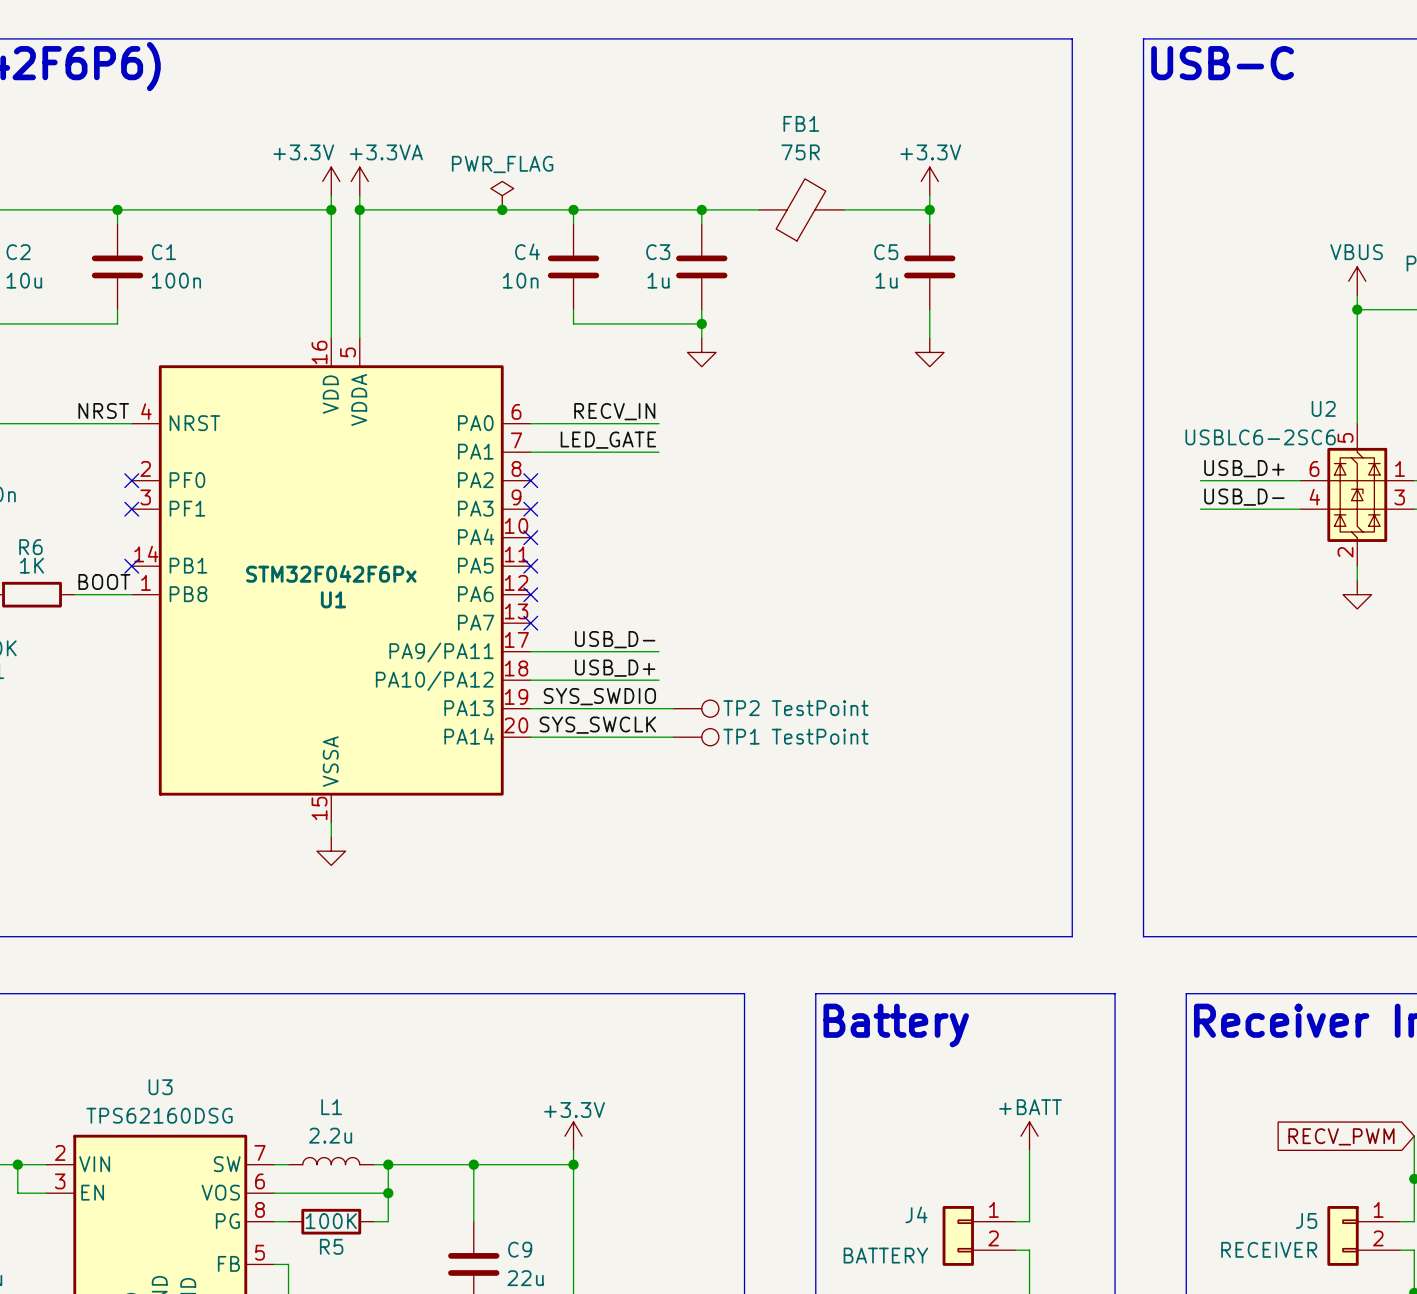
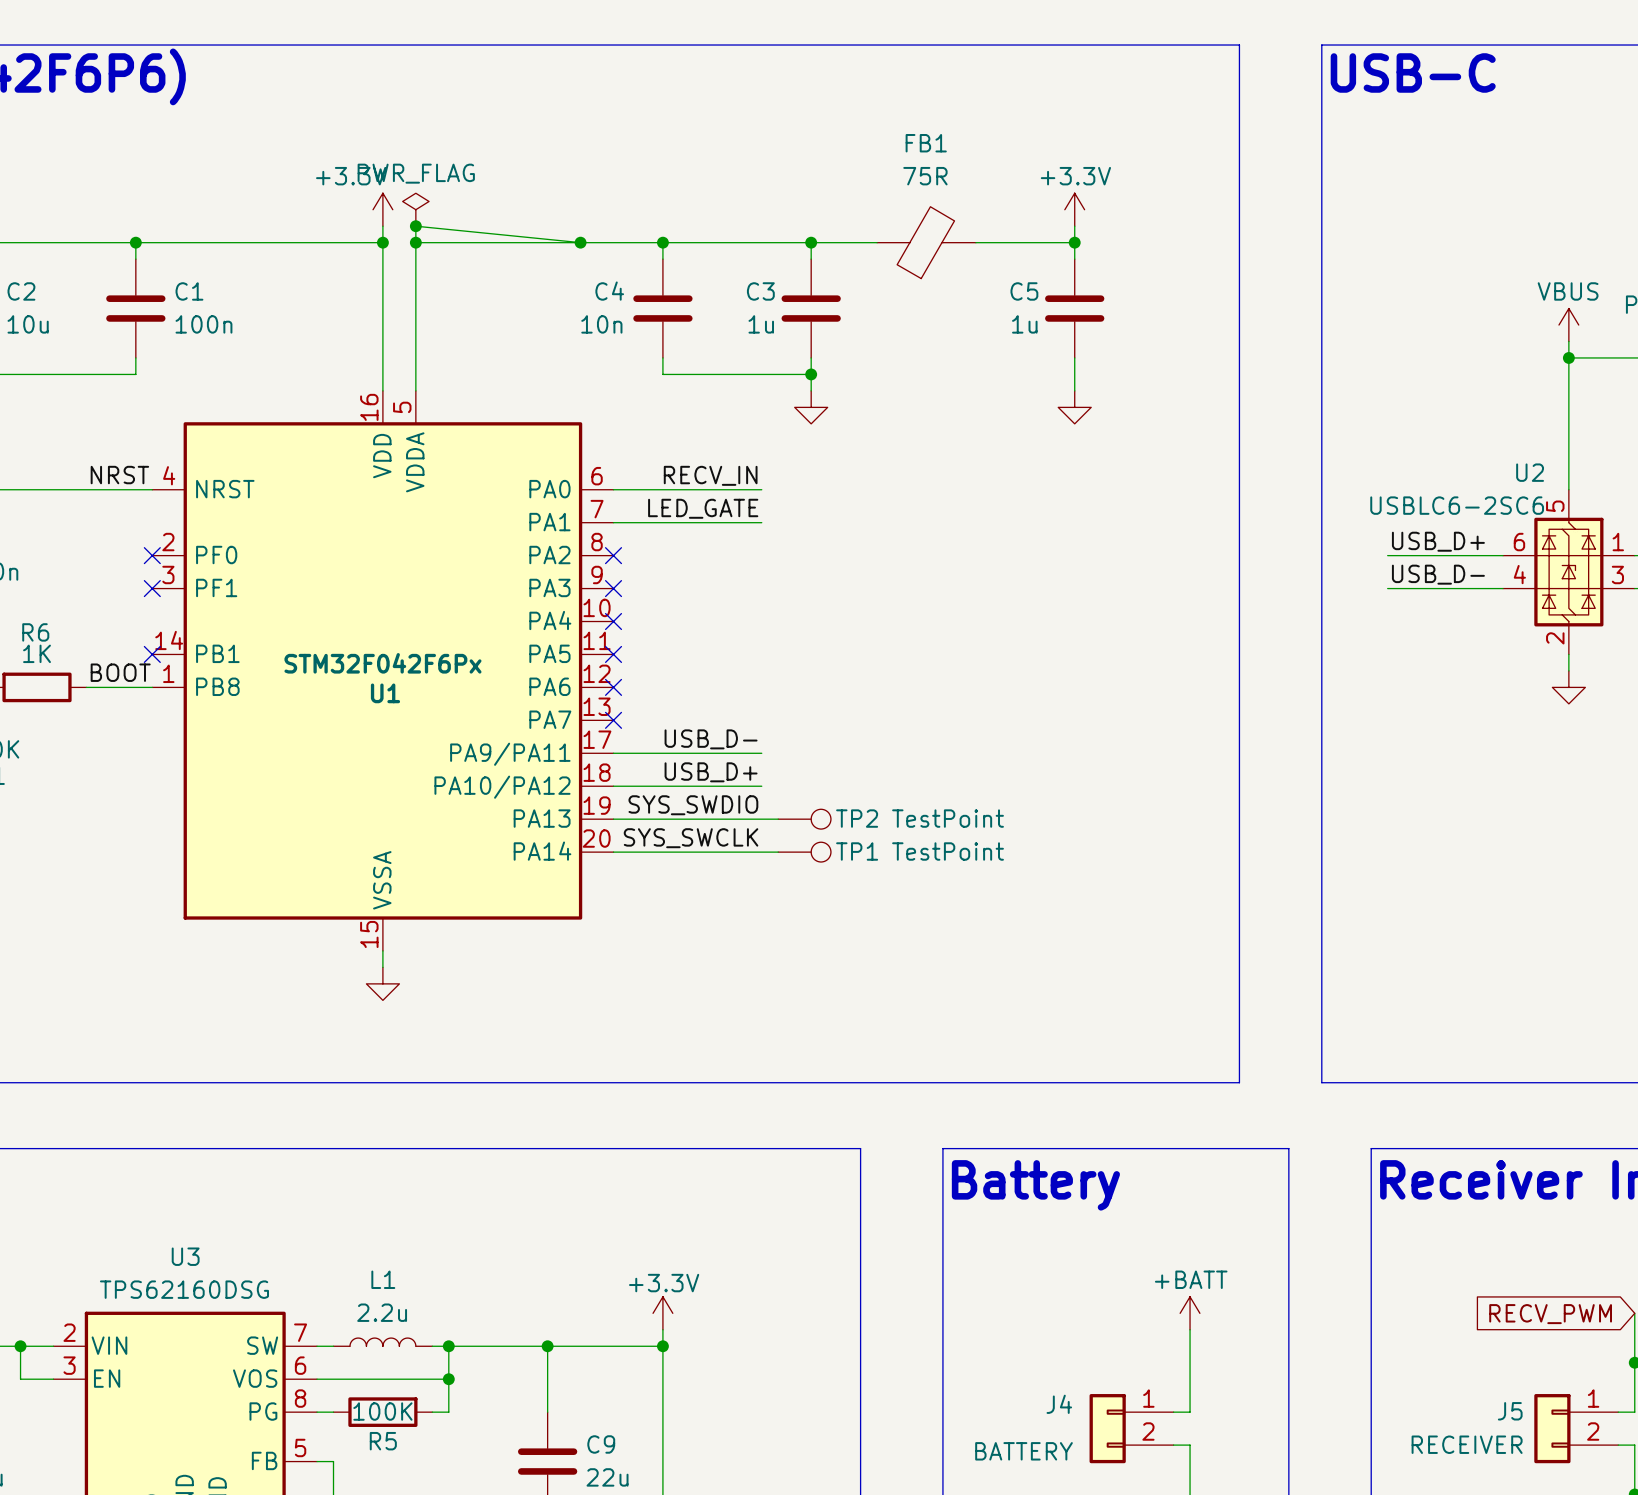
power symbol: +3.3VA (359, 181) -> PWR_FLAG (415, 209)
wire: none -> (415, 226) (580, 242)
junction: none -> (415, 226)
power symbol: PWR_FLAG (502, 195) -> none

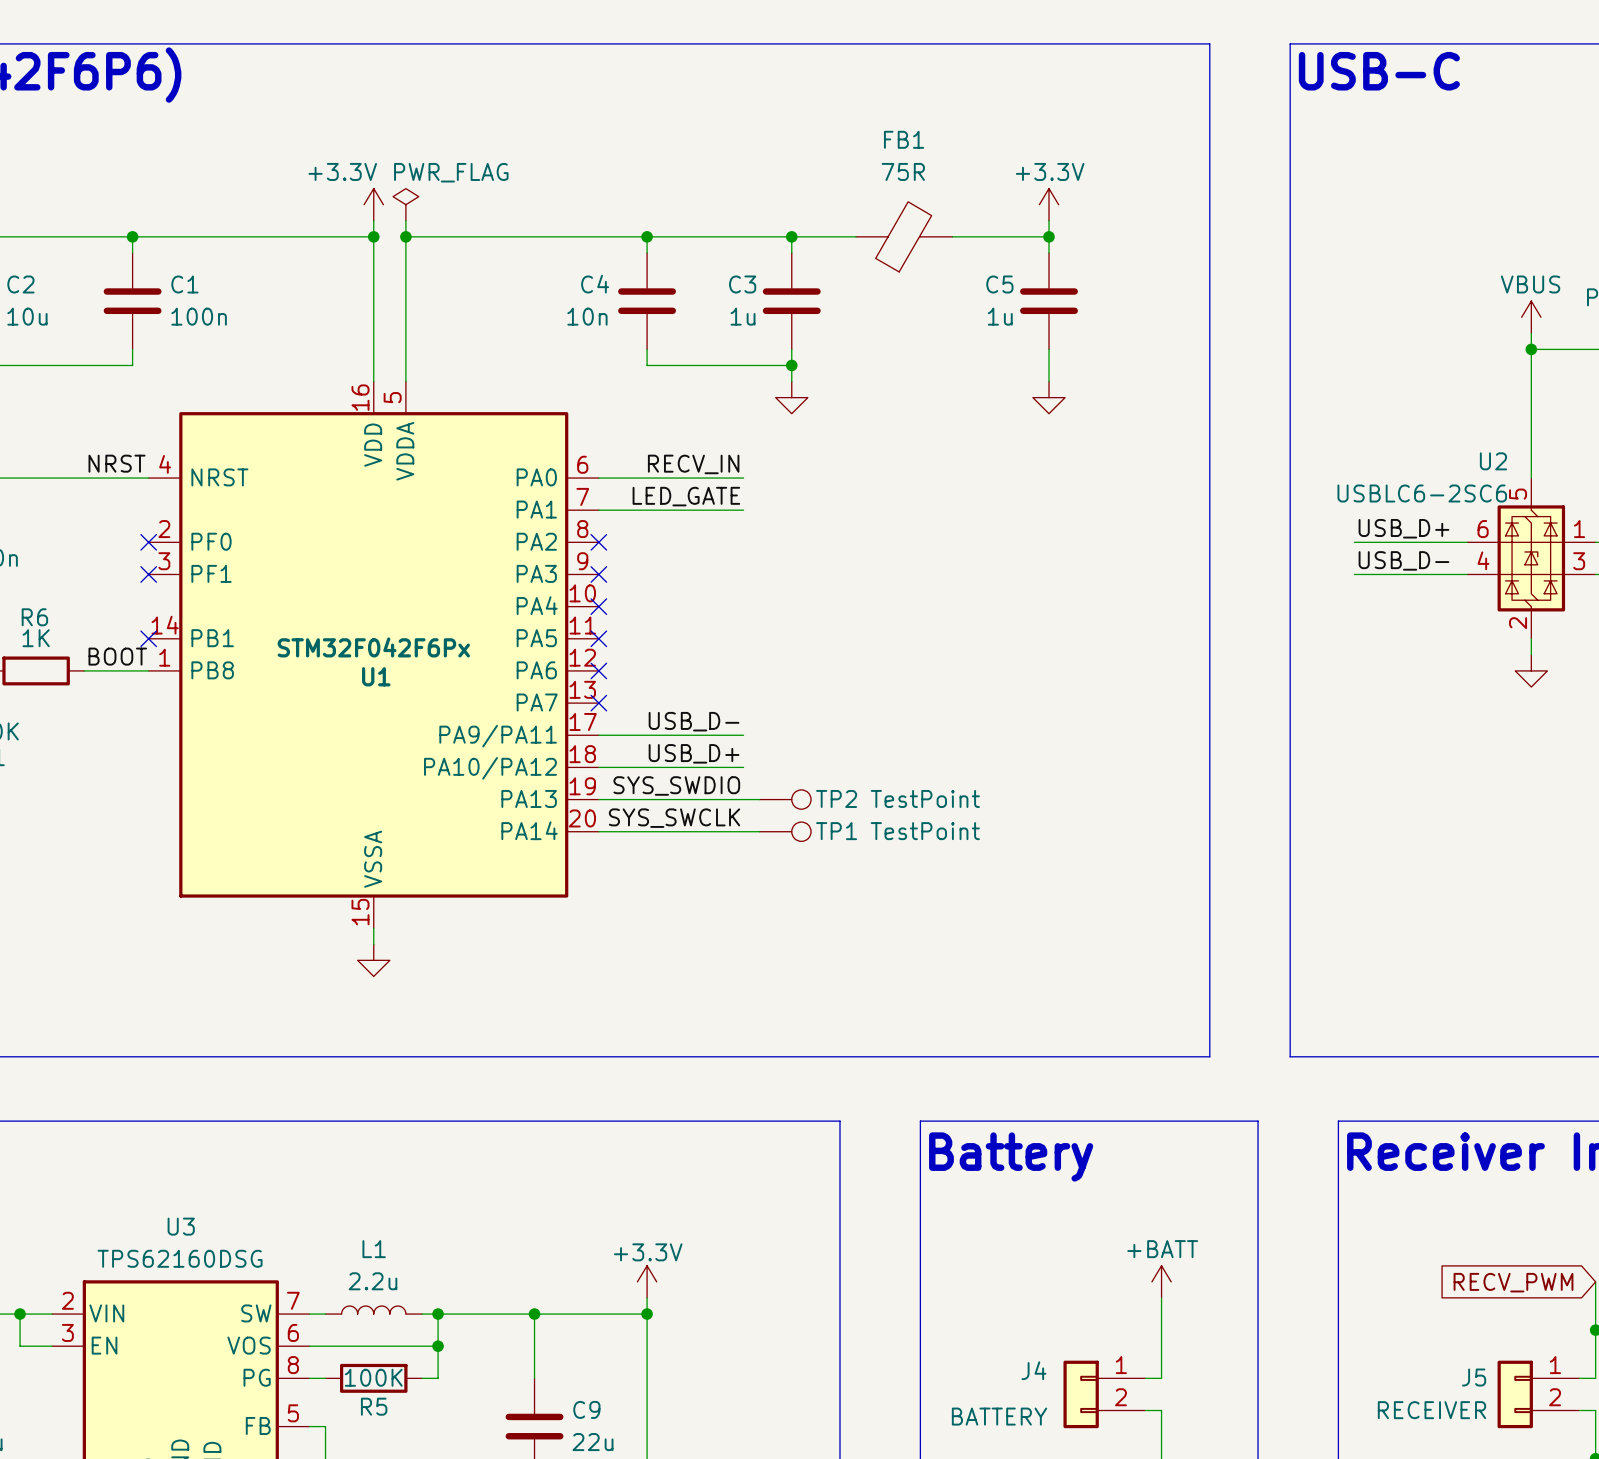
power symbol text position: PWR_FLAG (416, 173) -> PWR_FLAG (451, 172)
wire: (415, 226) (580, 242) -> none
junction: (415, 226) -> none
junction: (580, 242) -> none

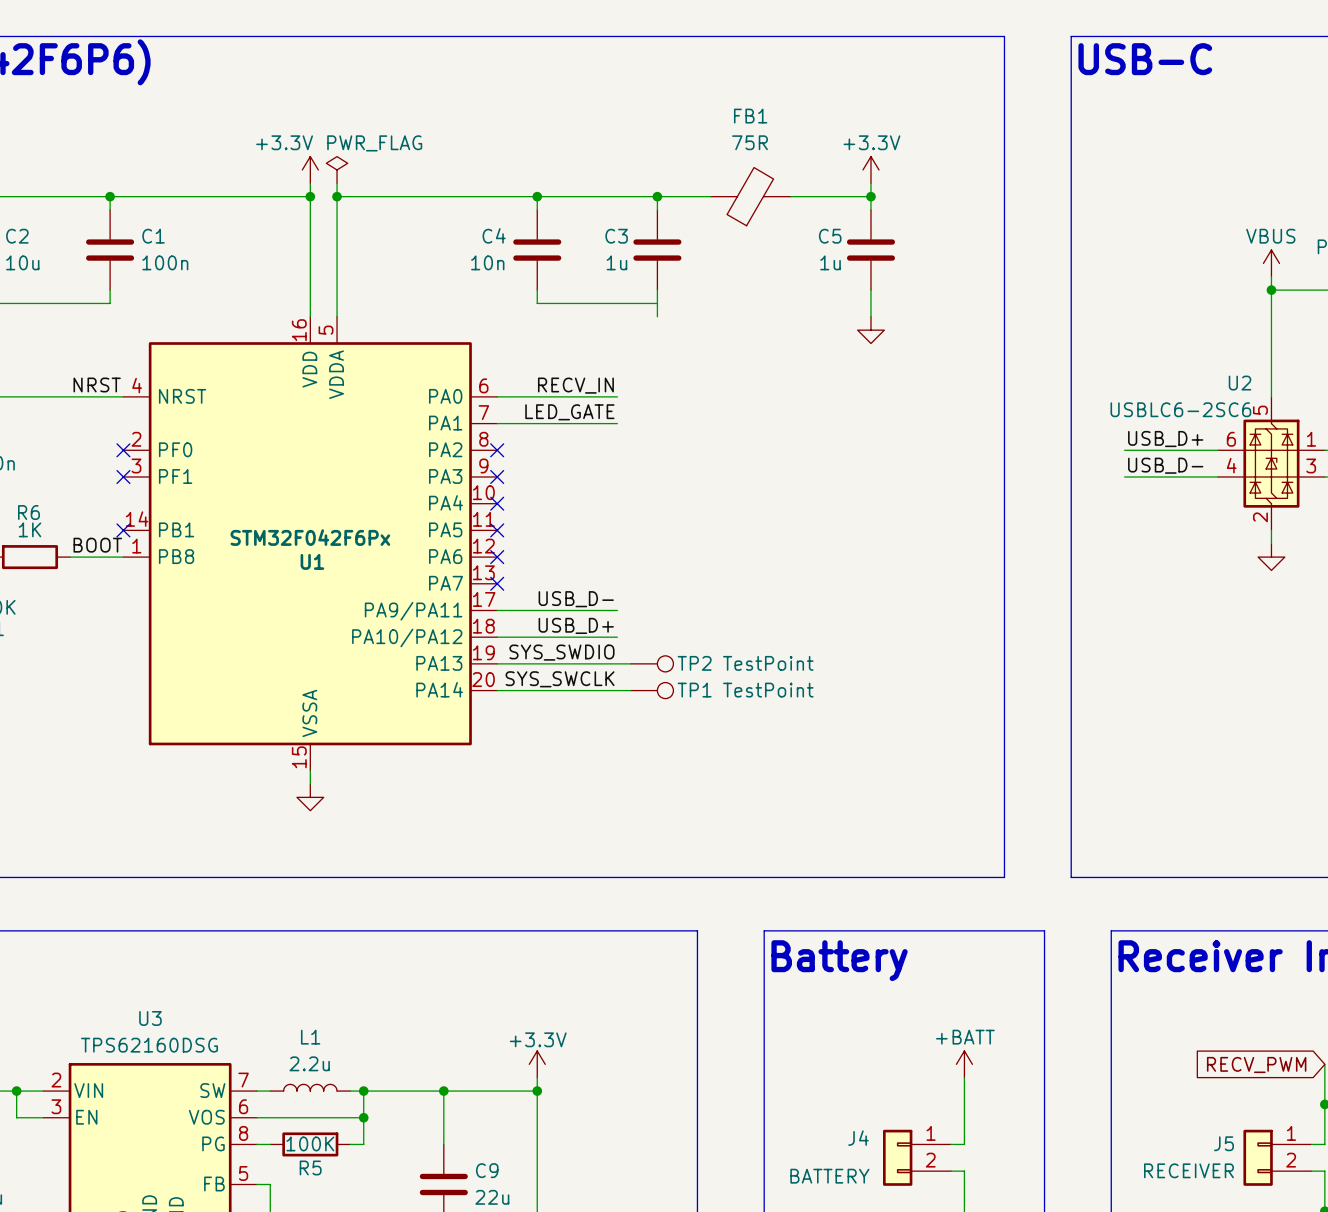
junction: (791, 365) -> none
power symbol: (791, 397) -> none

